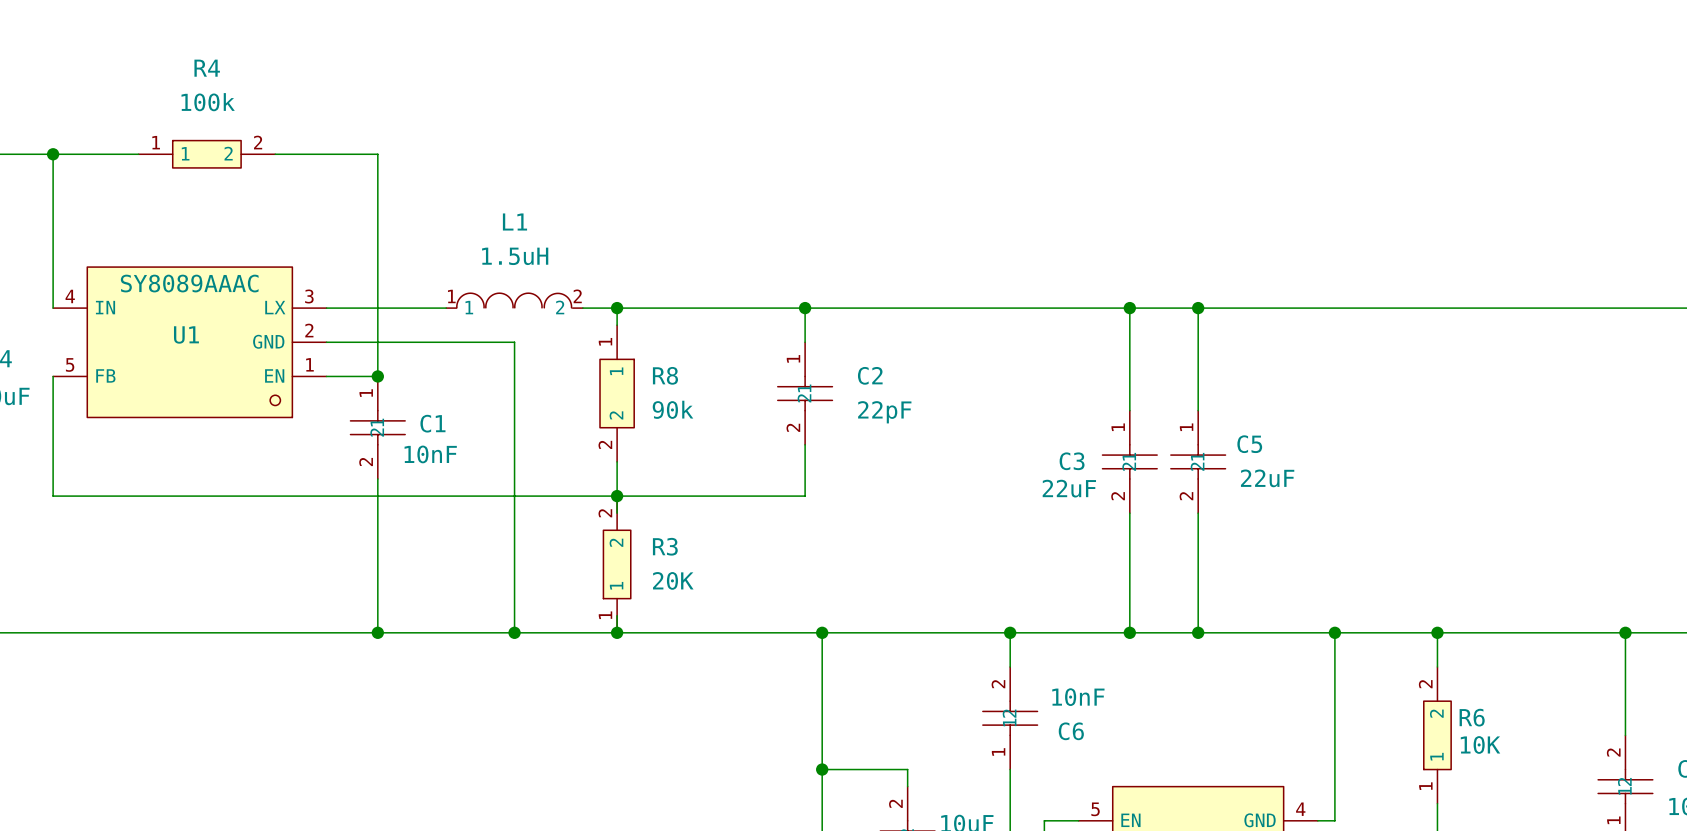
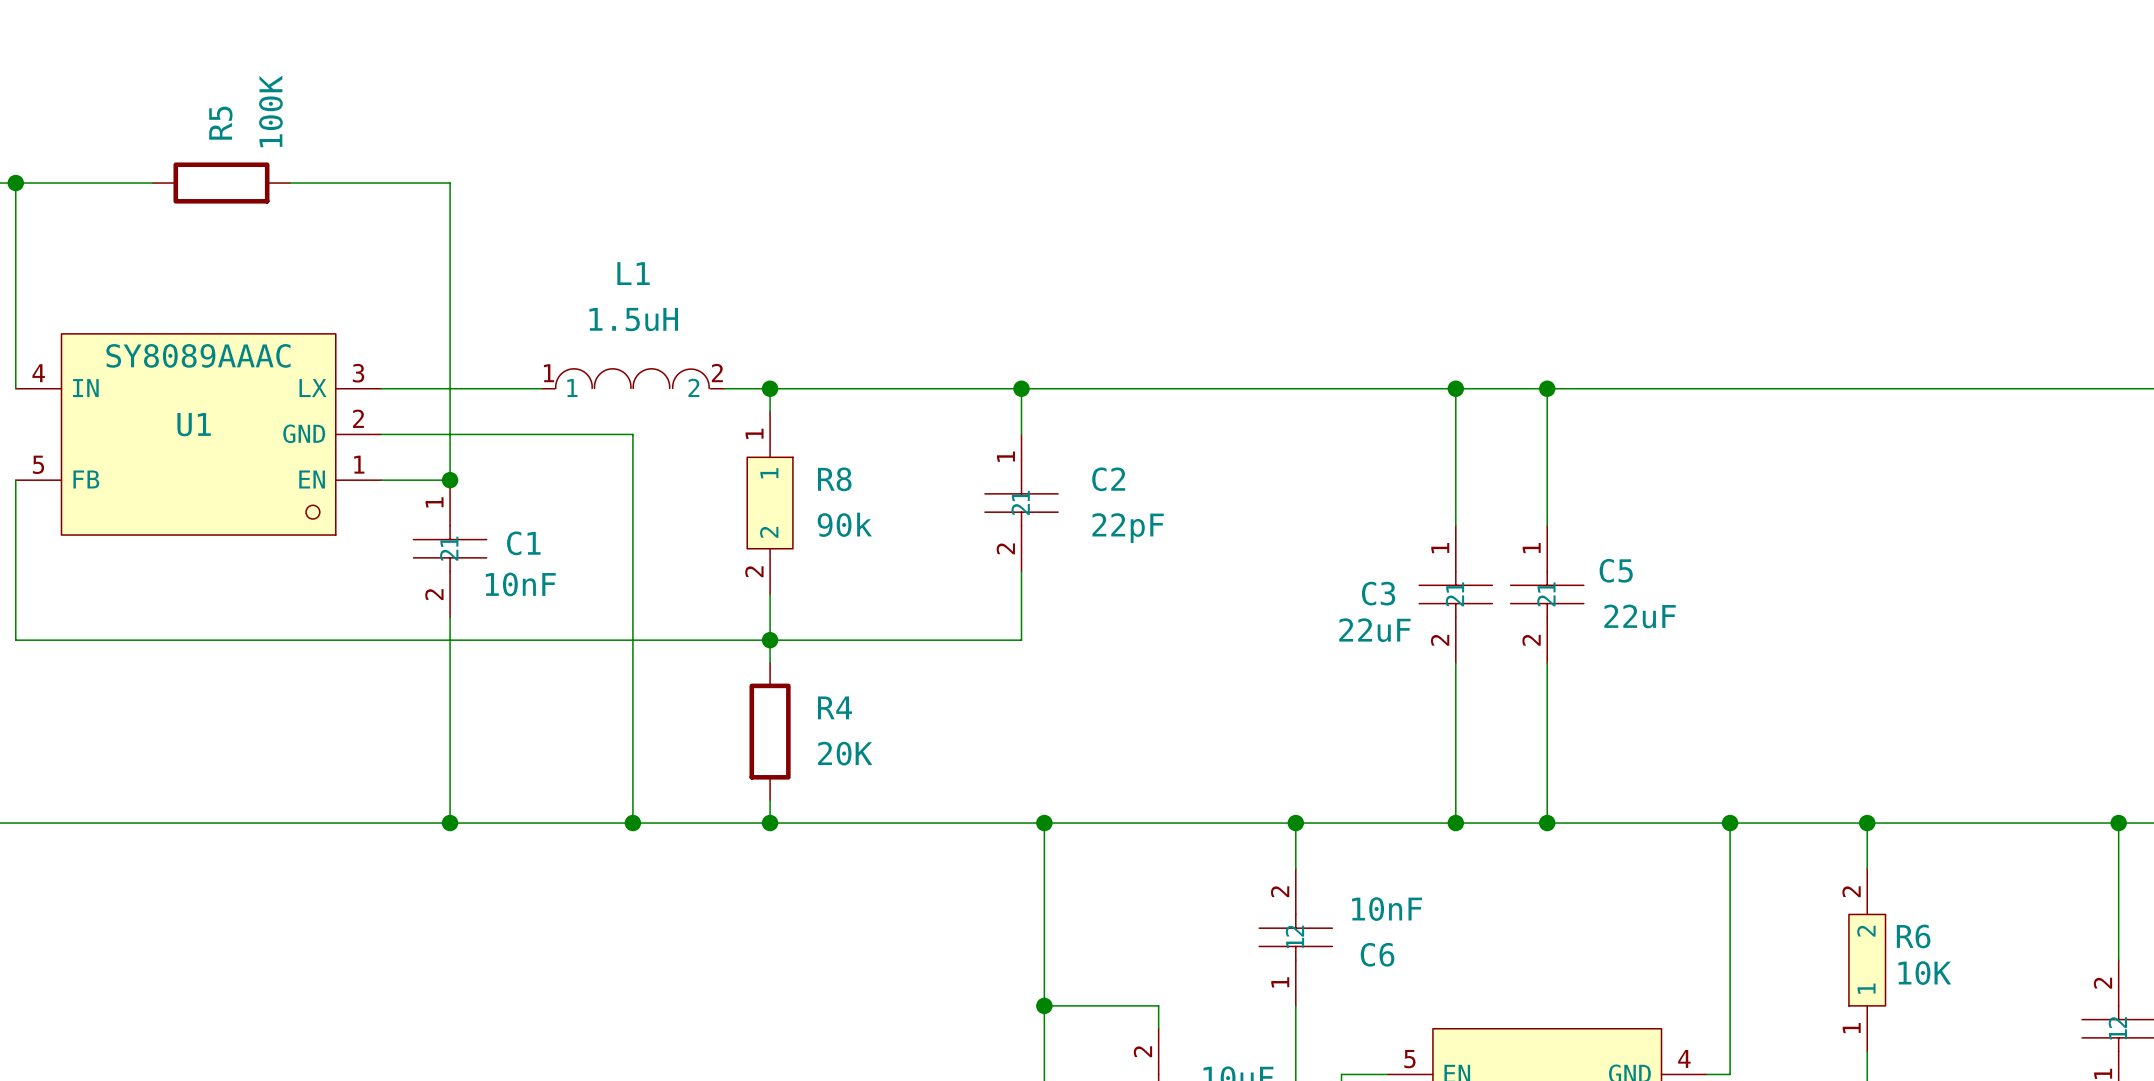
R4 name position: R4 (207, 68) -> R4 (835, 707)
R4 value: 100k (208, 102) -> 20K (845, 753)
R4 symbol: [138, 140, 276, 168] -> [749, 663, 791, 801]
R5: none -> 100K (221, 183)
R3: 20K (617, 564) -> none

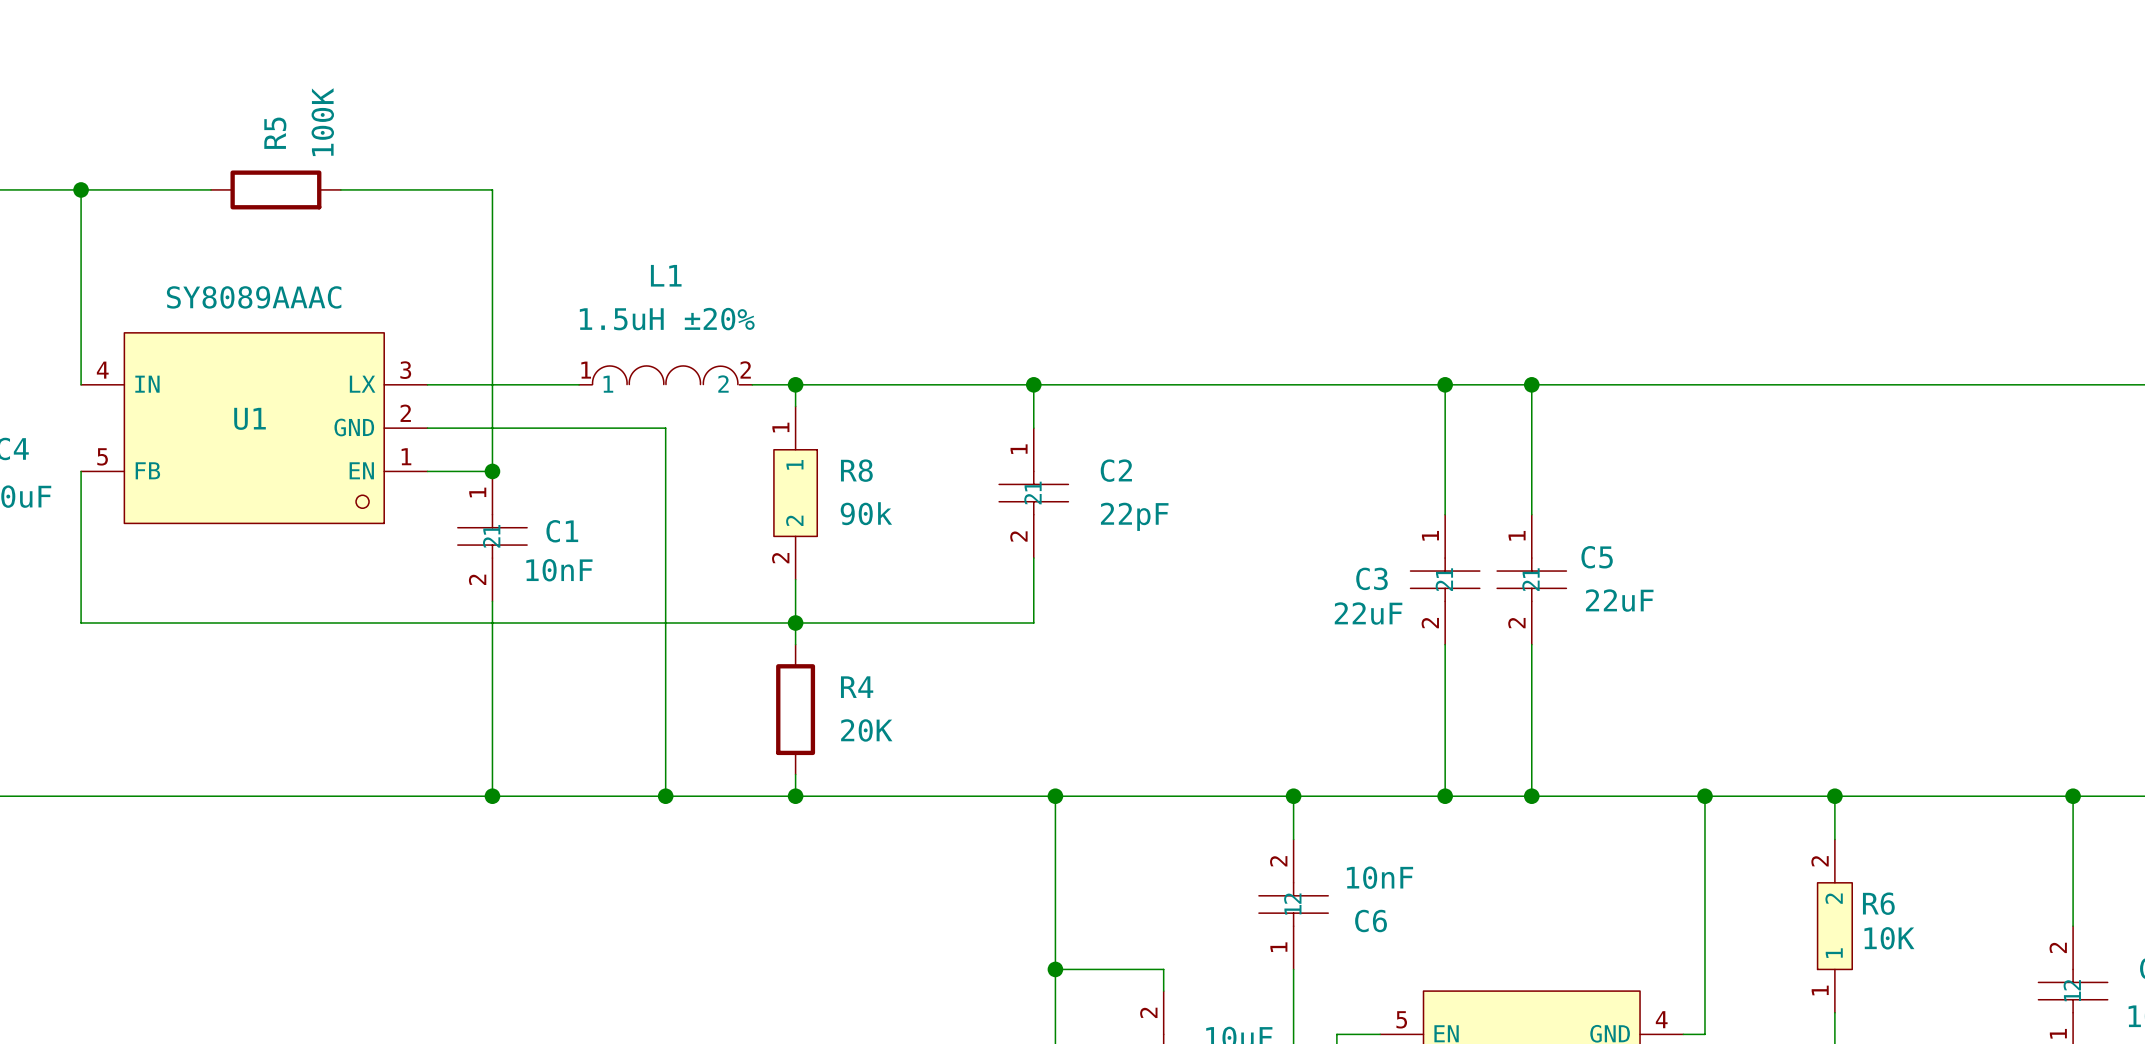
L1 value: 1.5uH (633, 319) -> 1.5uH ±20% (667, 319)
U1 value position: SY8089AAAC (198, 355) -> SY8089AAAC (254, 297)

